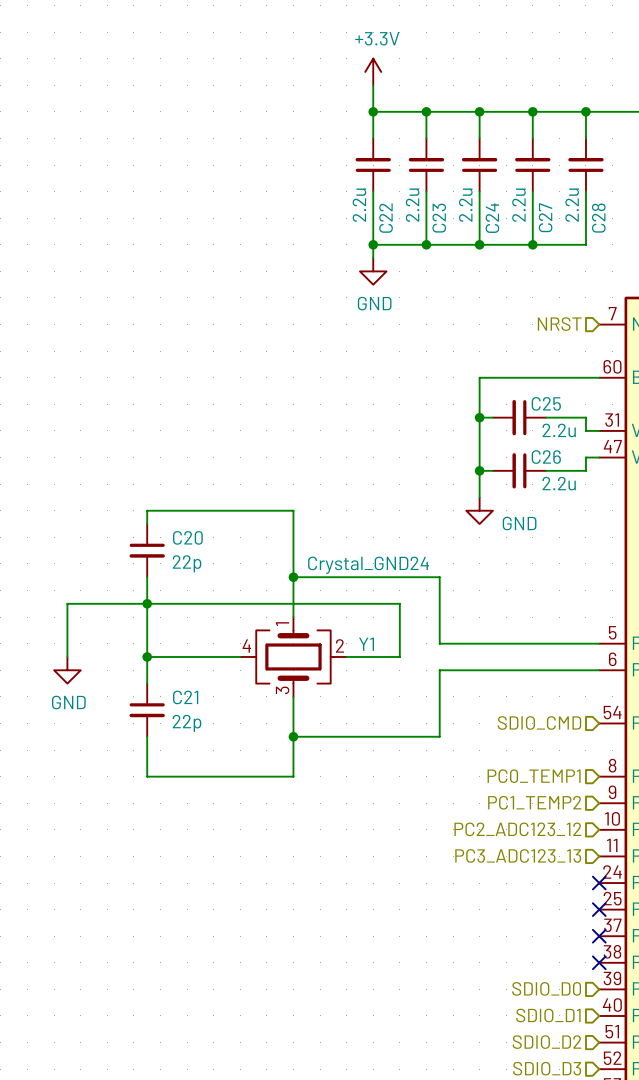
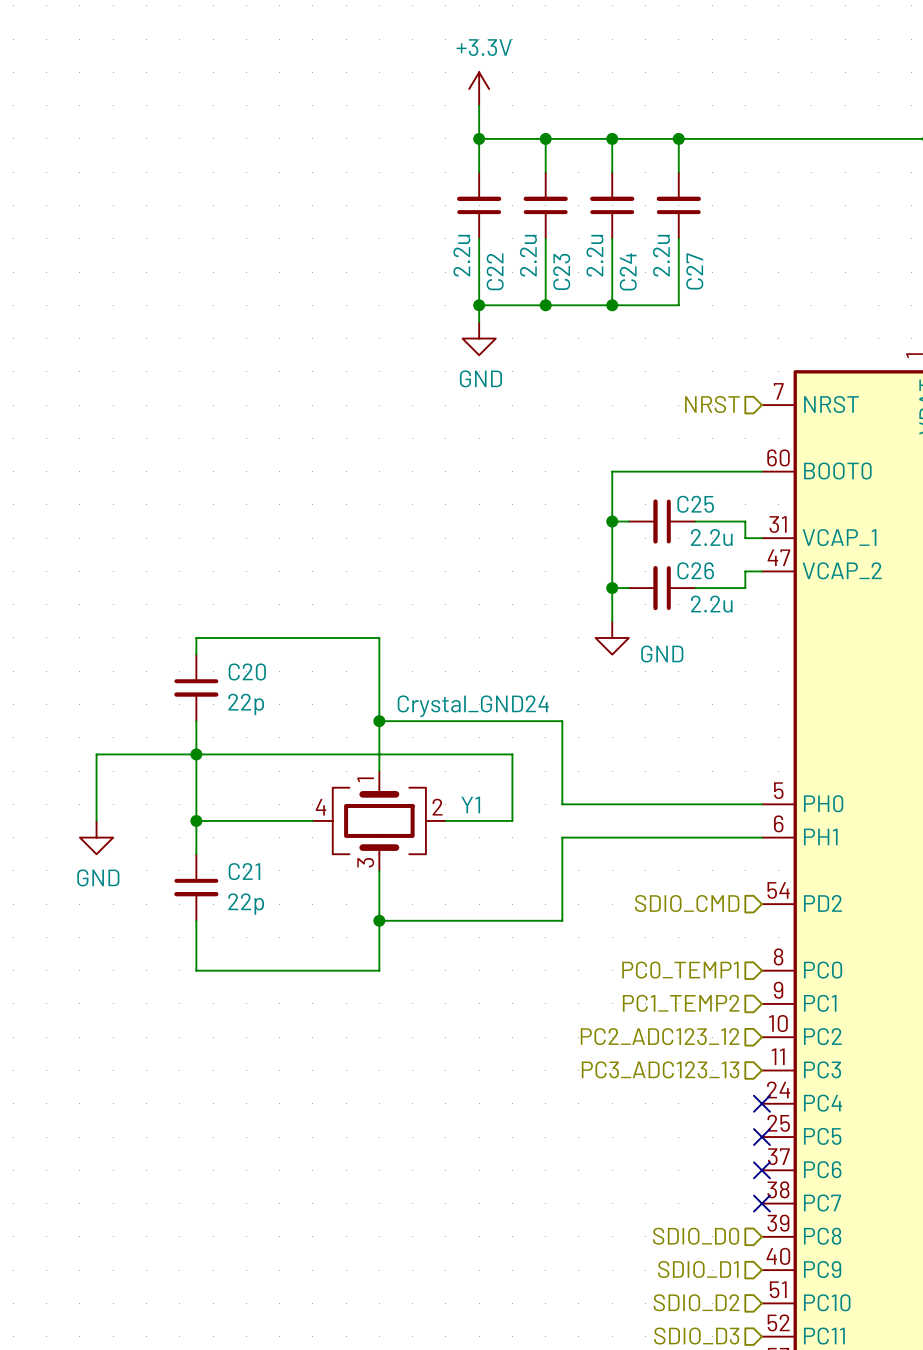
wire: (585, 111) (585, 138) -> none
junction: (585, 111) -> none
C28: 2.2u (585, 165) -> none
wire: (585, 191) (585, 244) (532, 244) -> none
junction: (532, 244) -> none

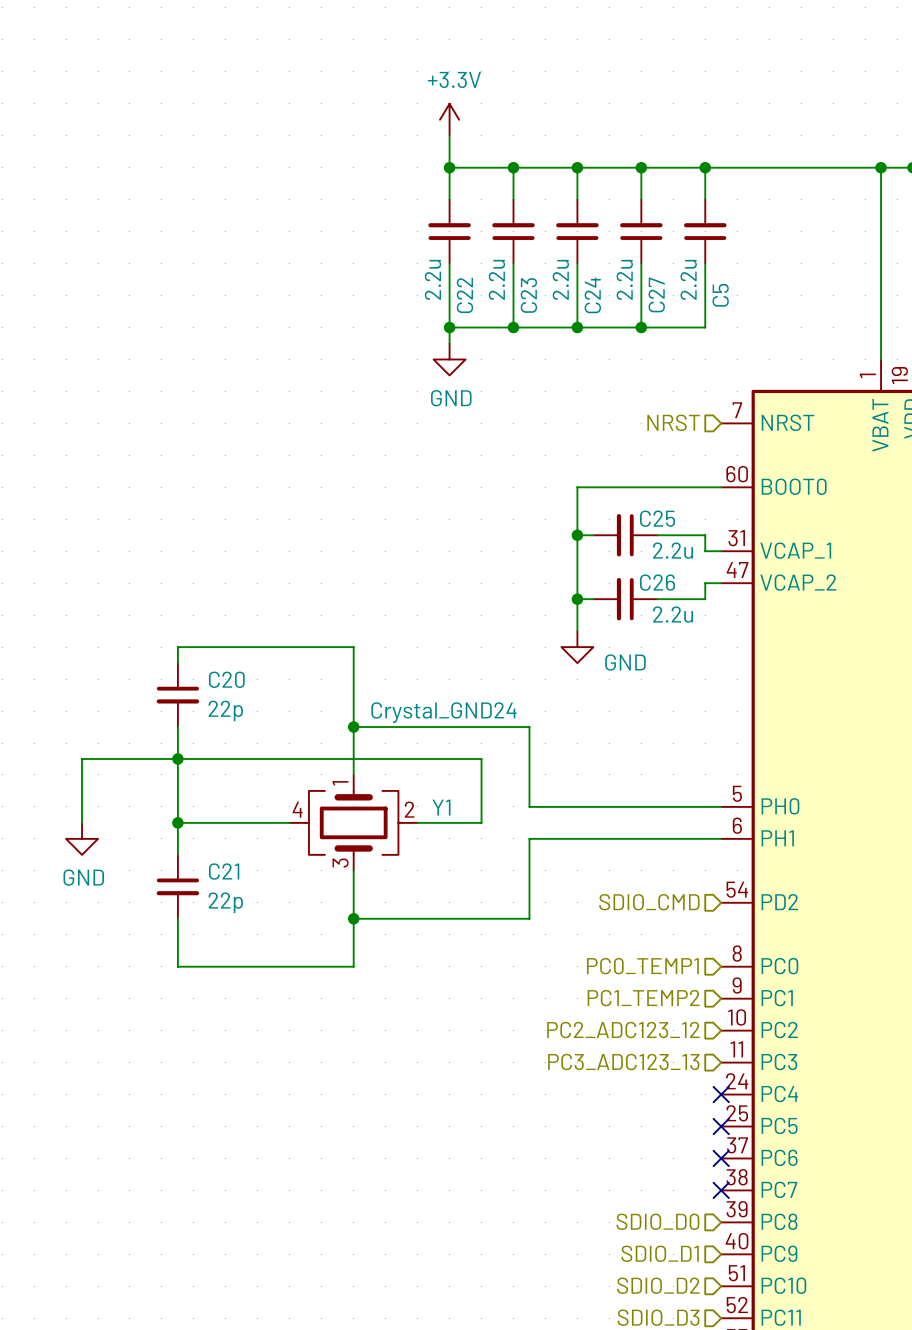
wire: none -> (705, 167) (705, 199)
junction: none -> (705, 167)
C5: none -> 2.2u (705, 231)
wire: none -> (705, 263) (705, 327) (641, 327)
junction: none -> (641, 327)

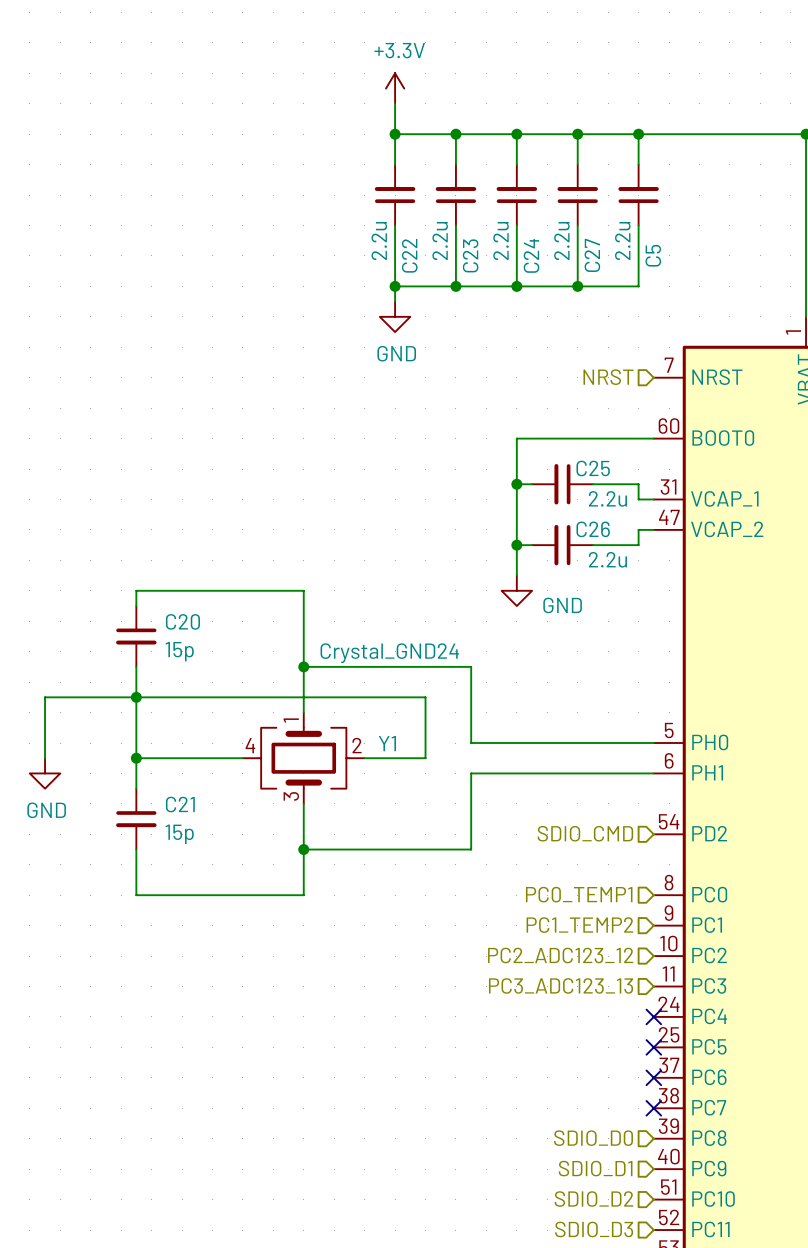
C20 value: 22p (225, 710) -> 15p (179, 651)
C21 value: 22p (225, 902) -> 15p (179, 834)

